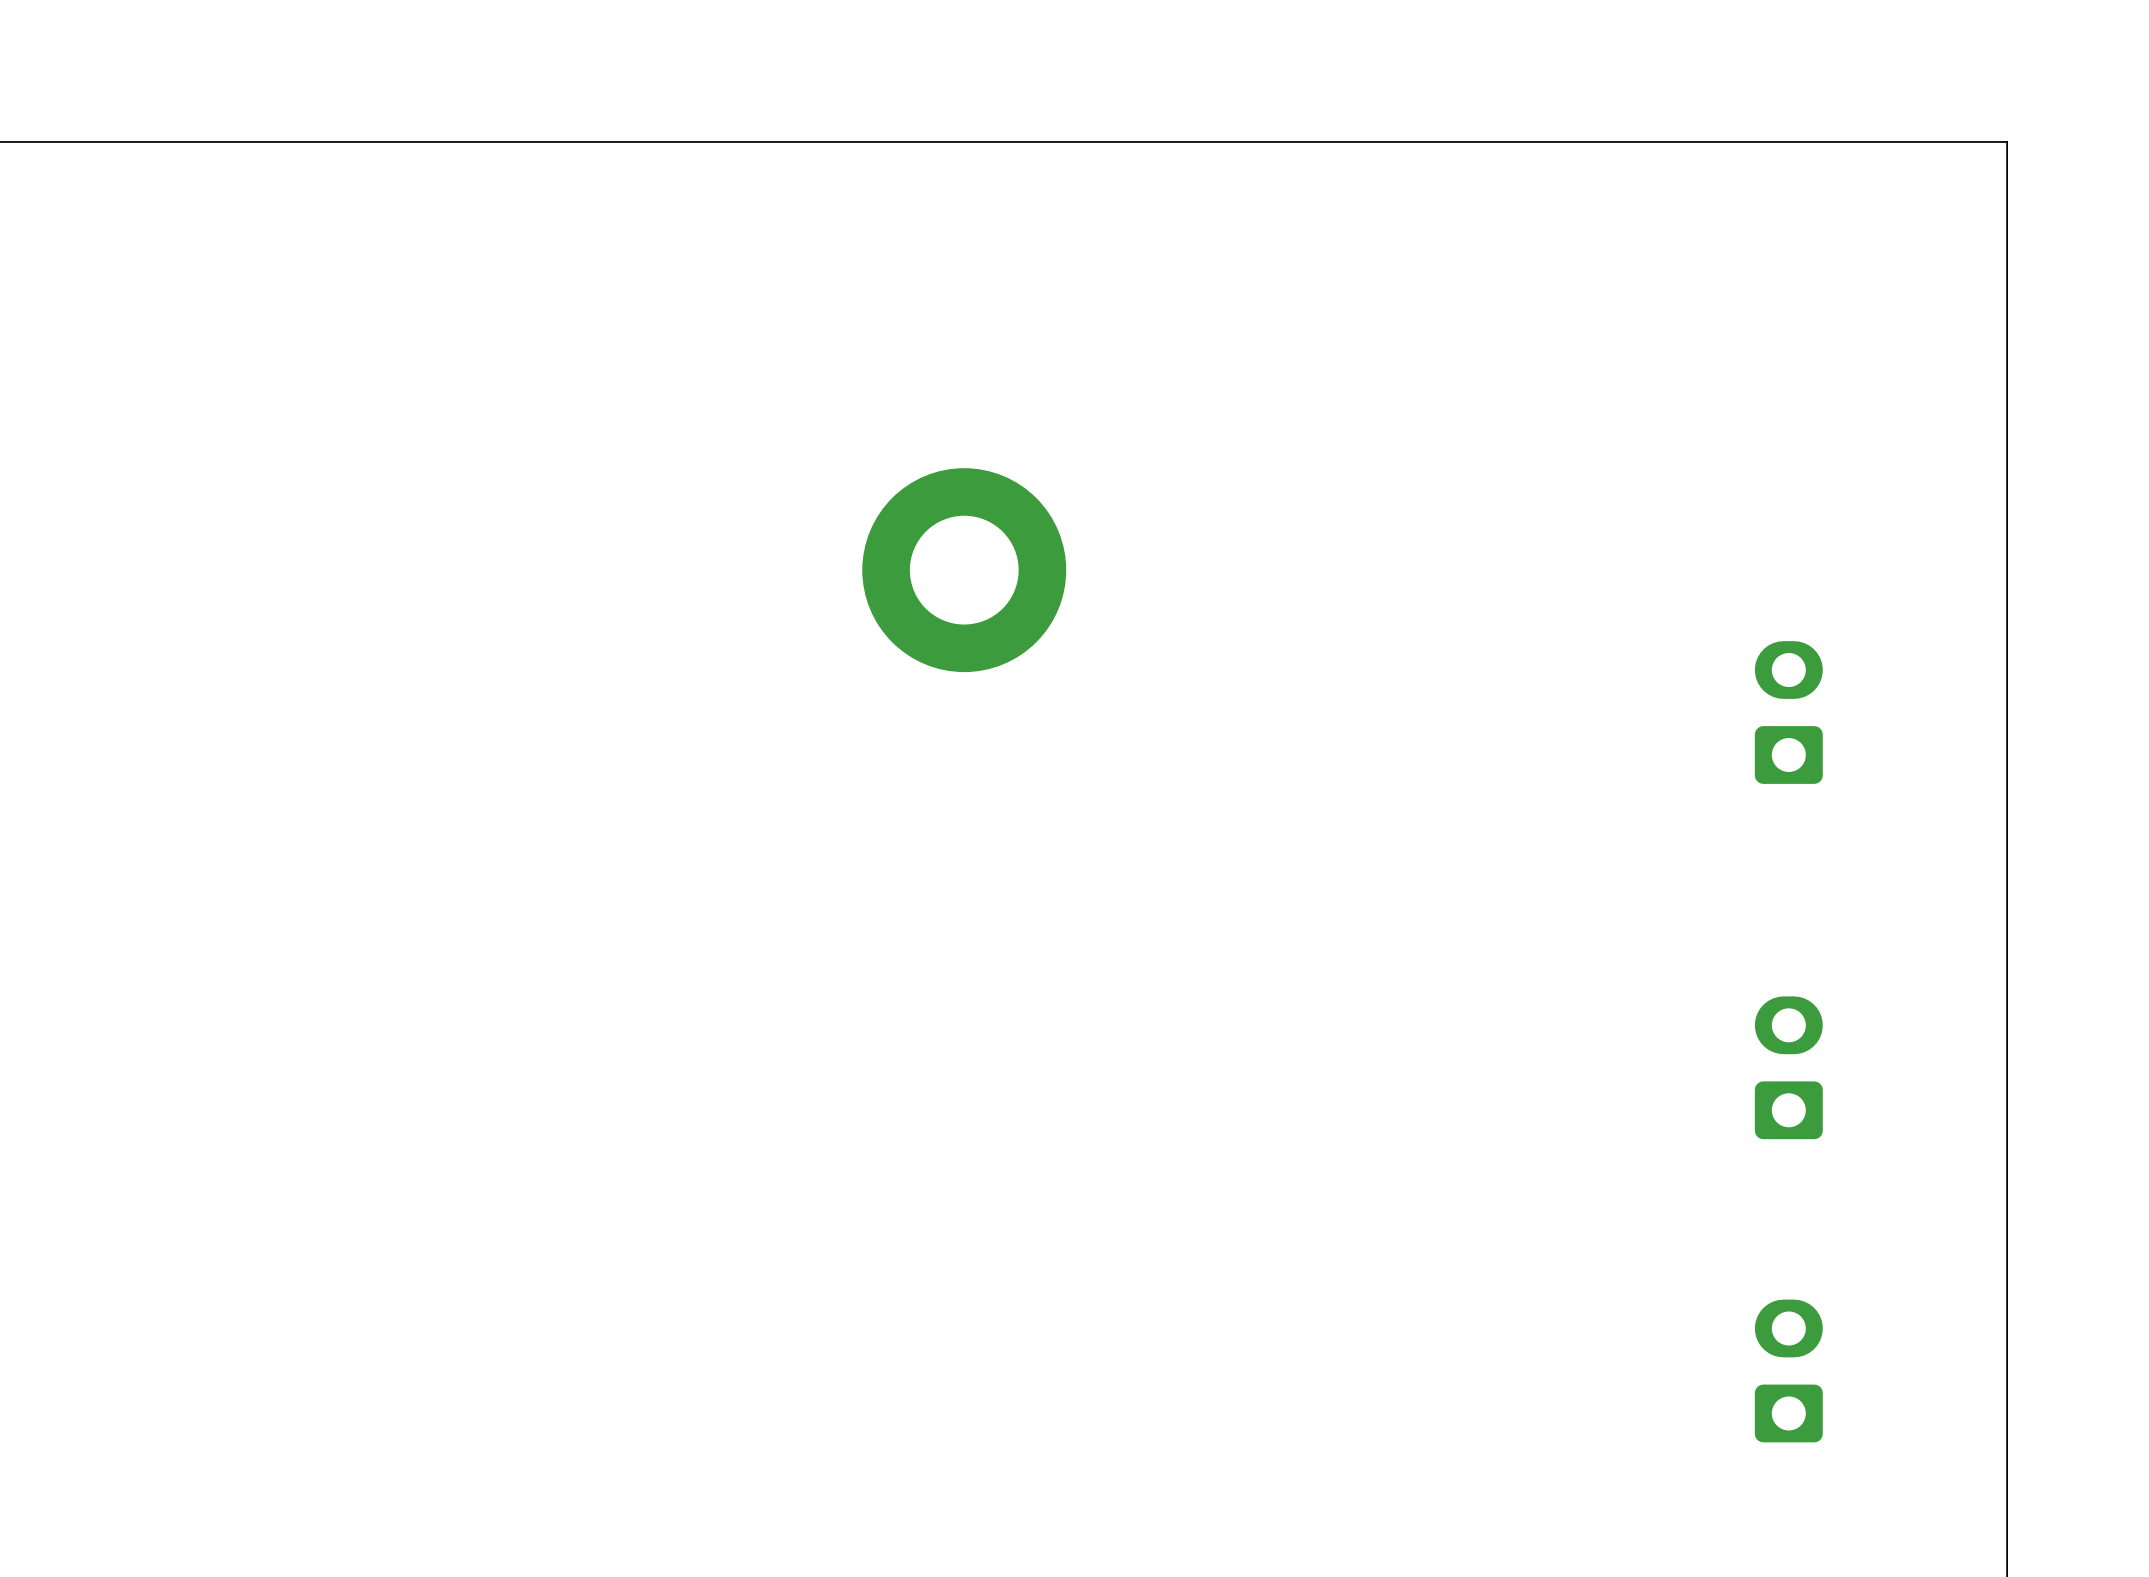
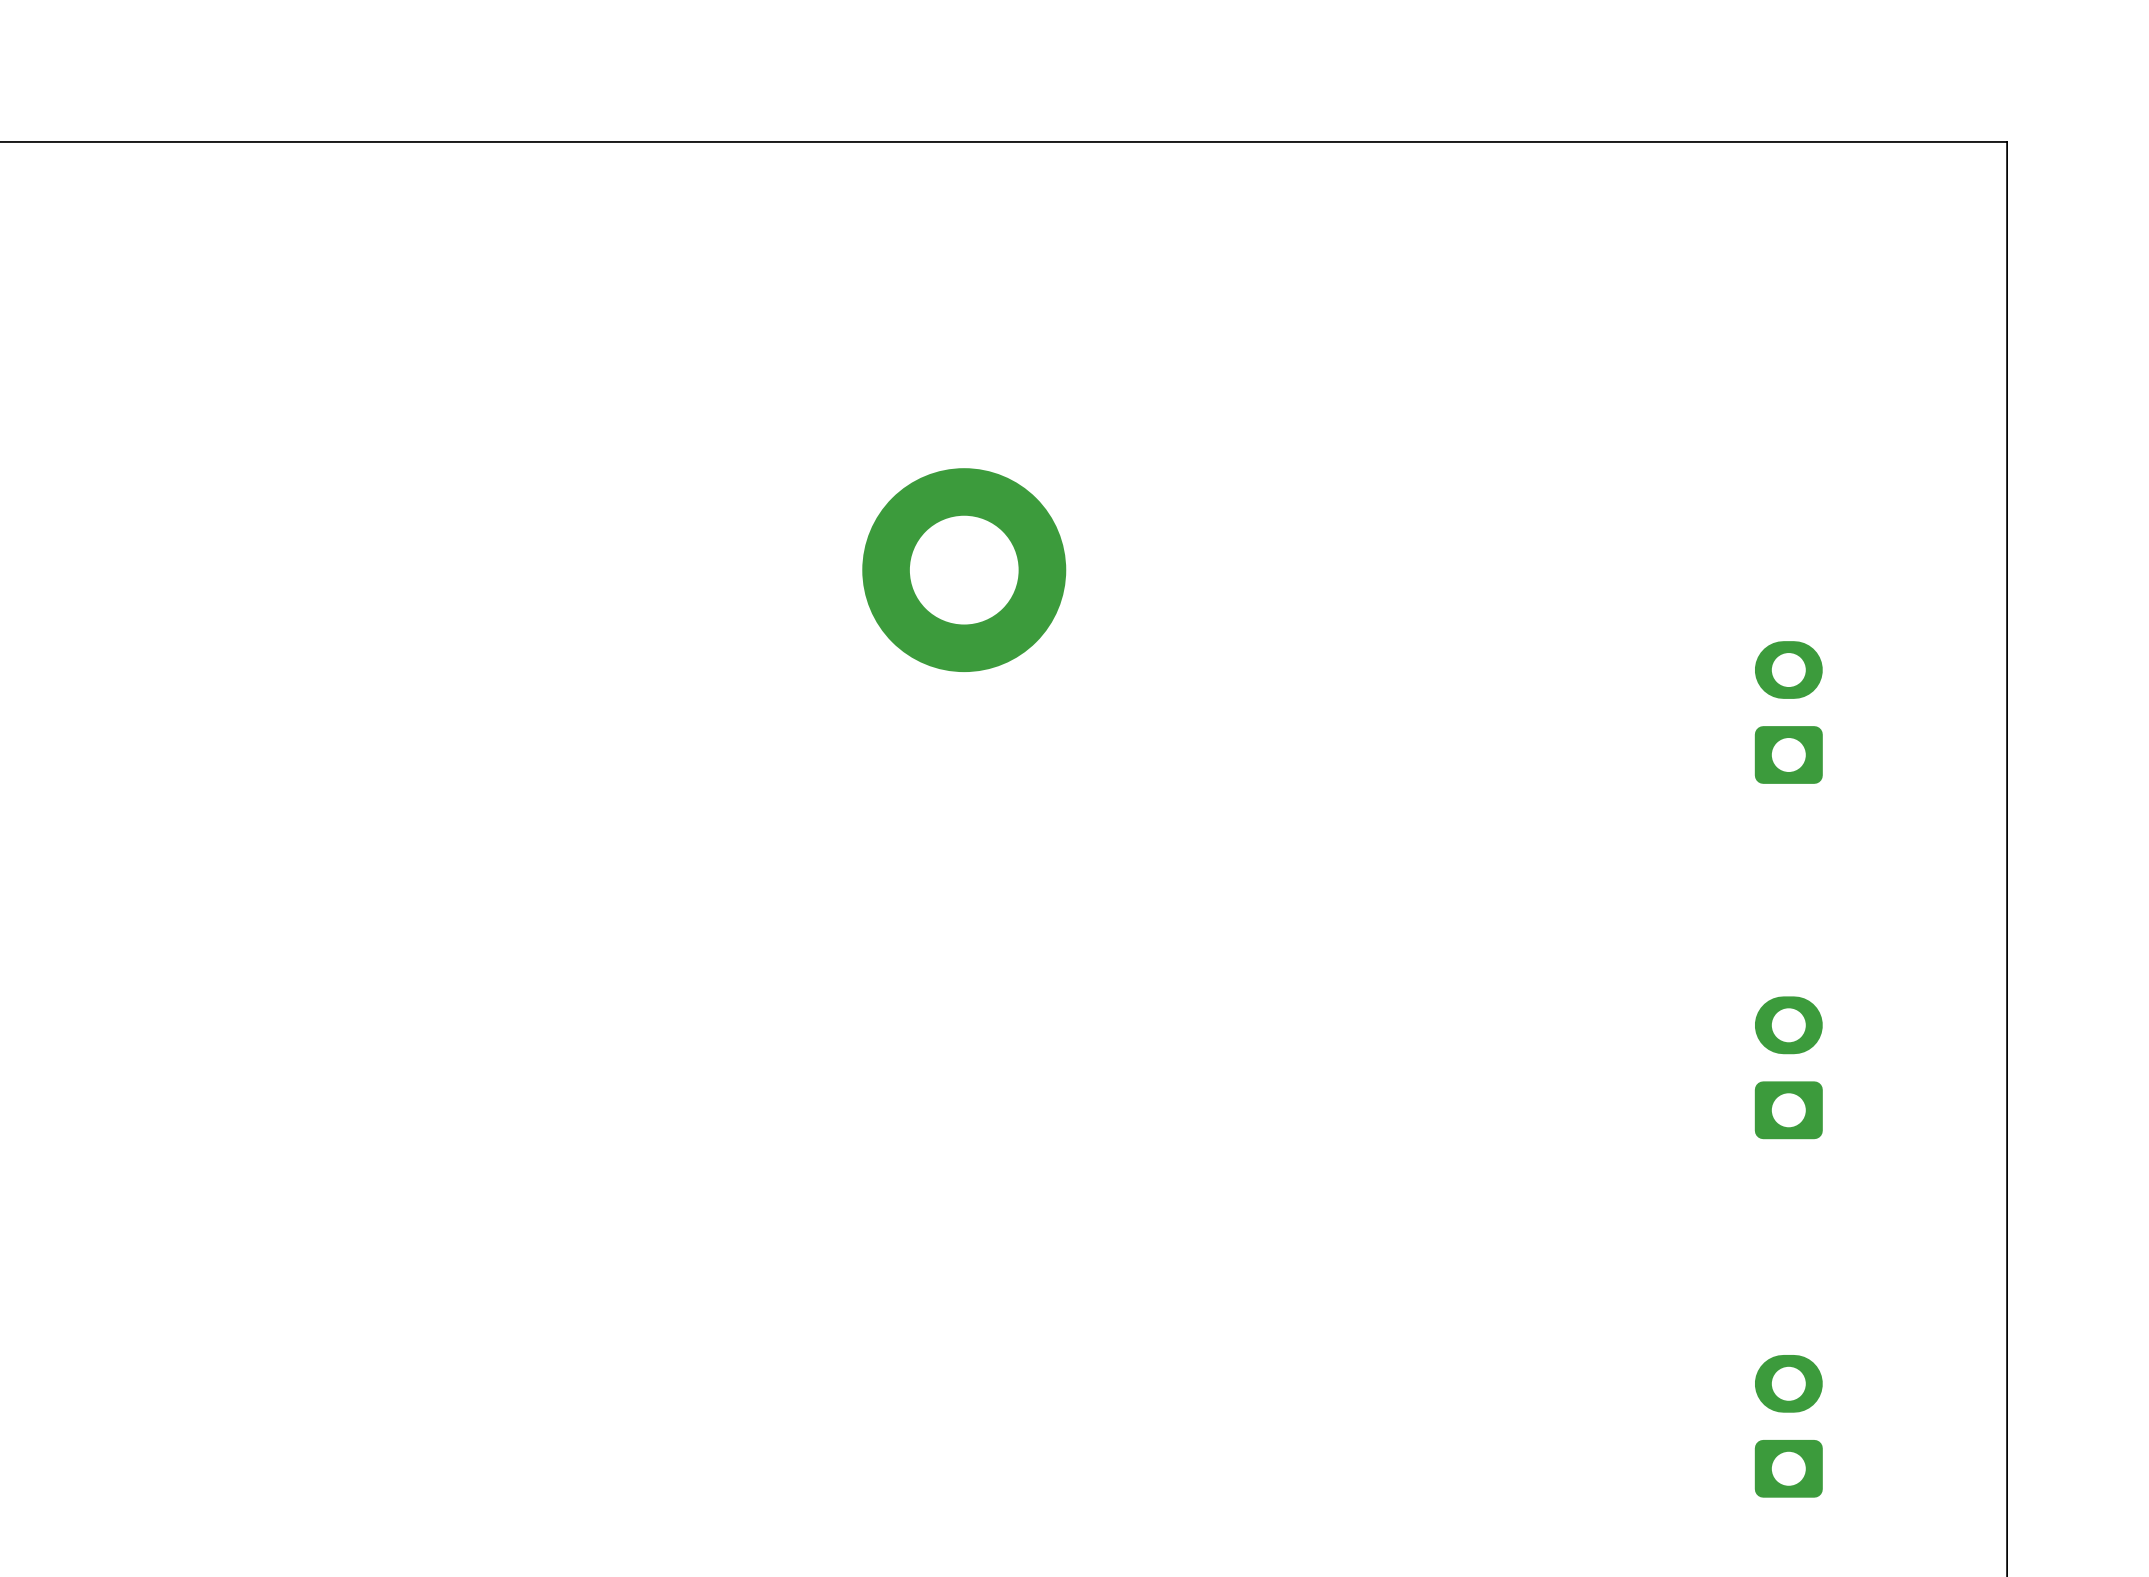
part position: (1788, 1370) -> (1788, 1426)

